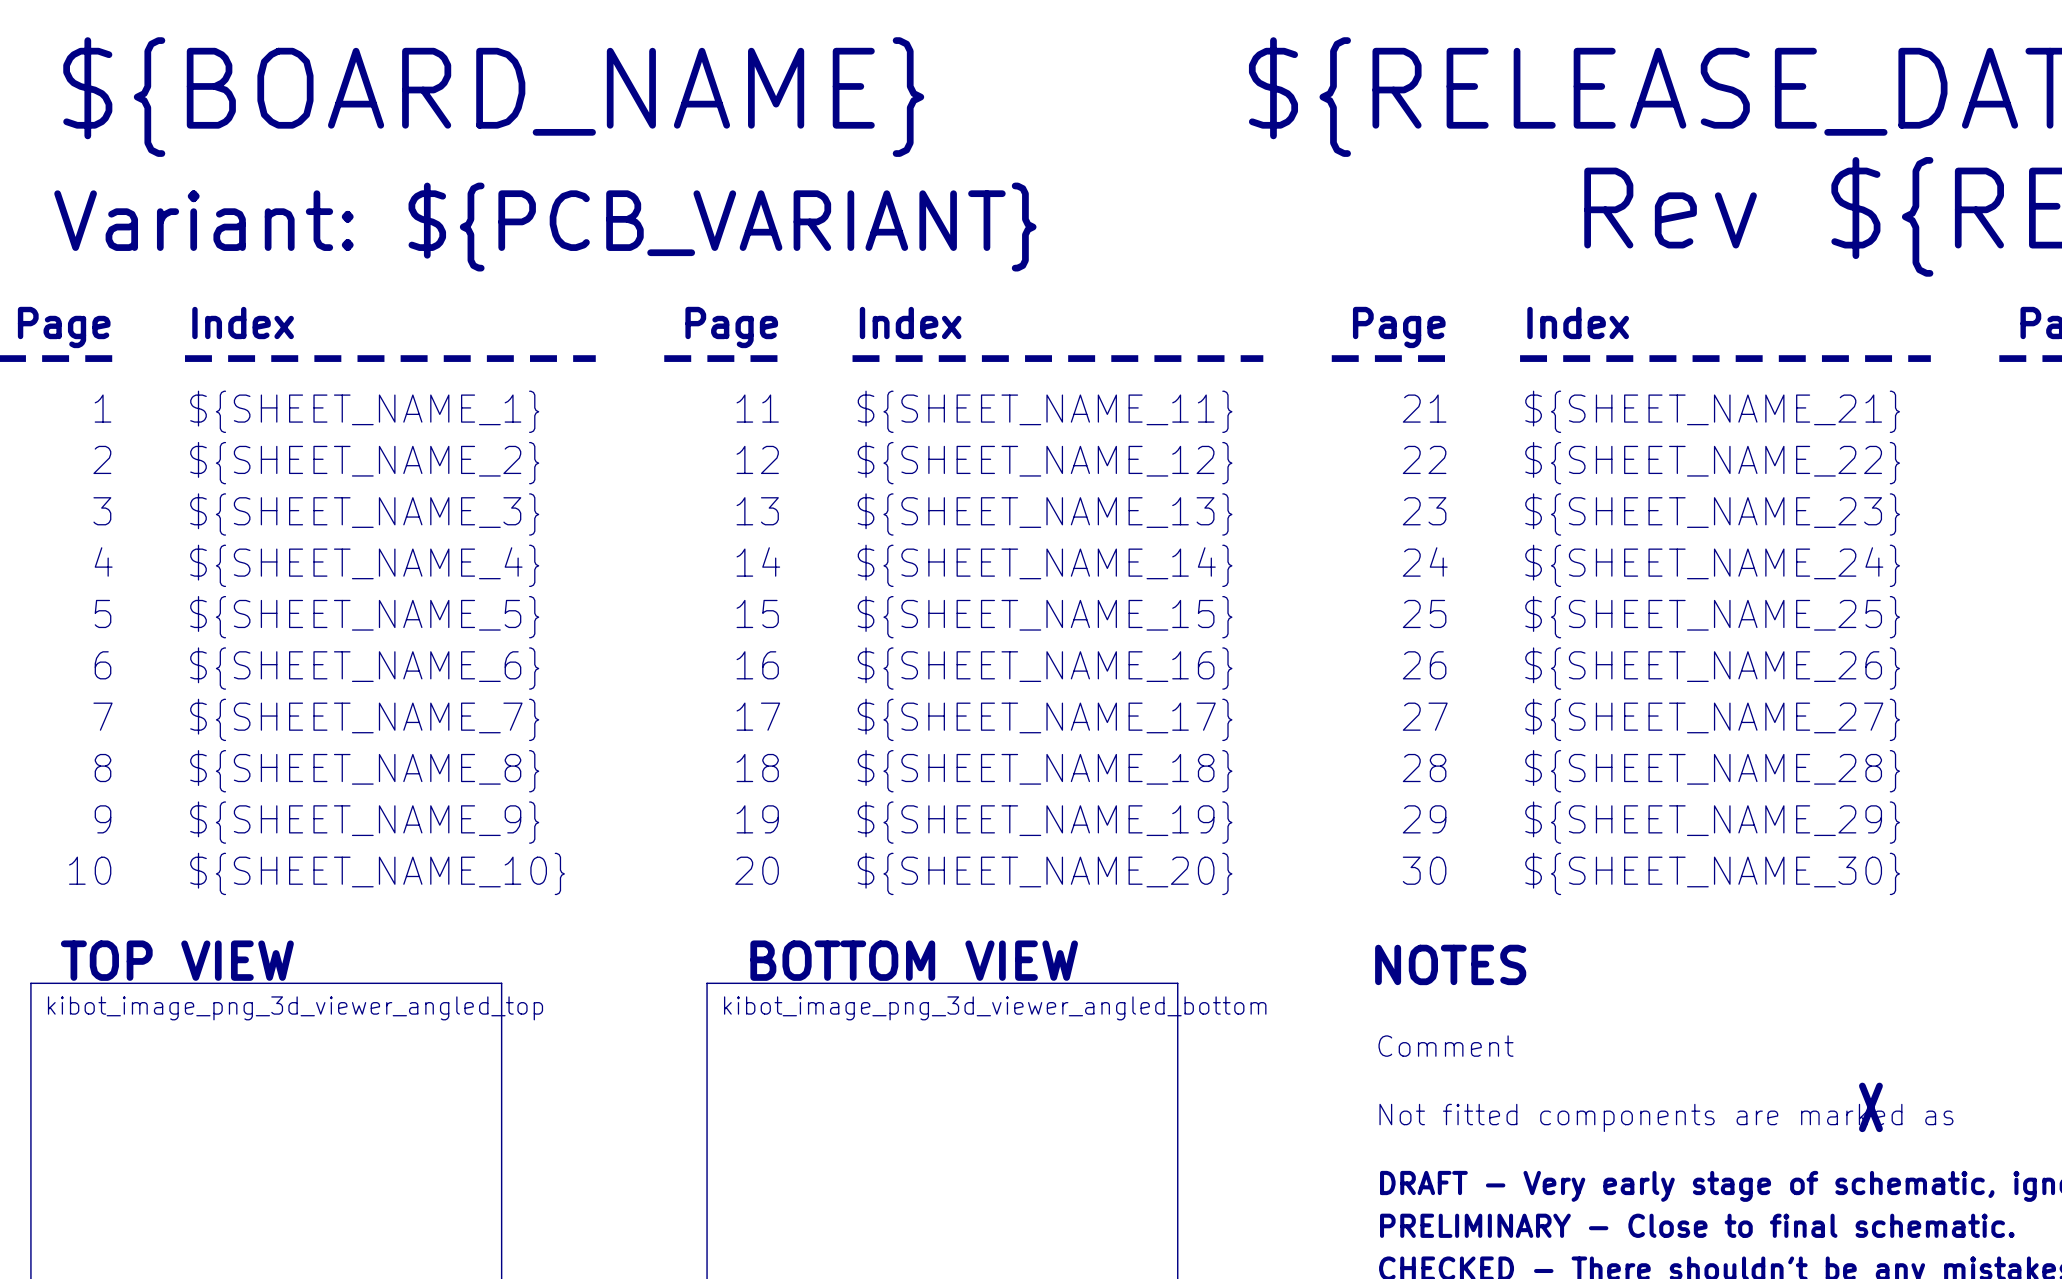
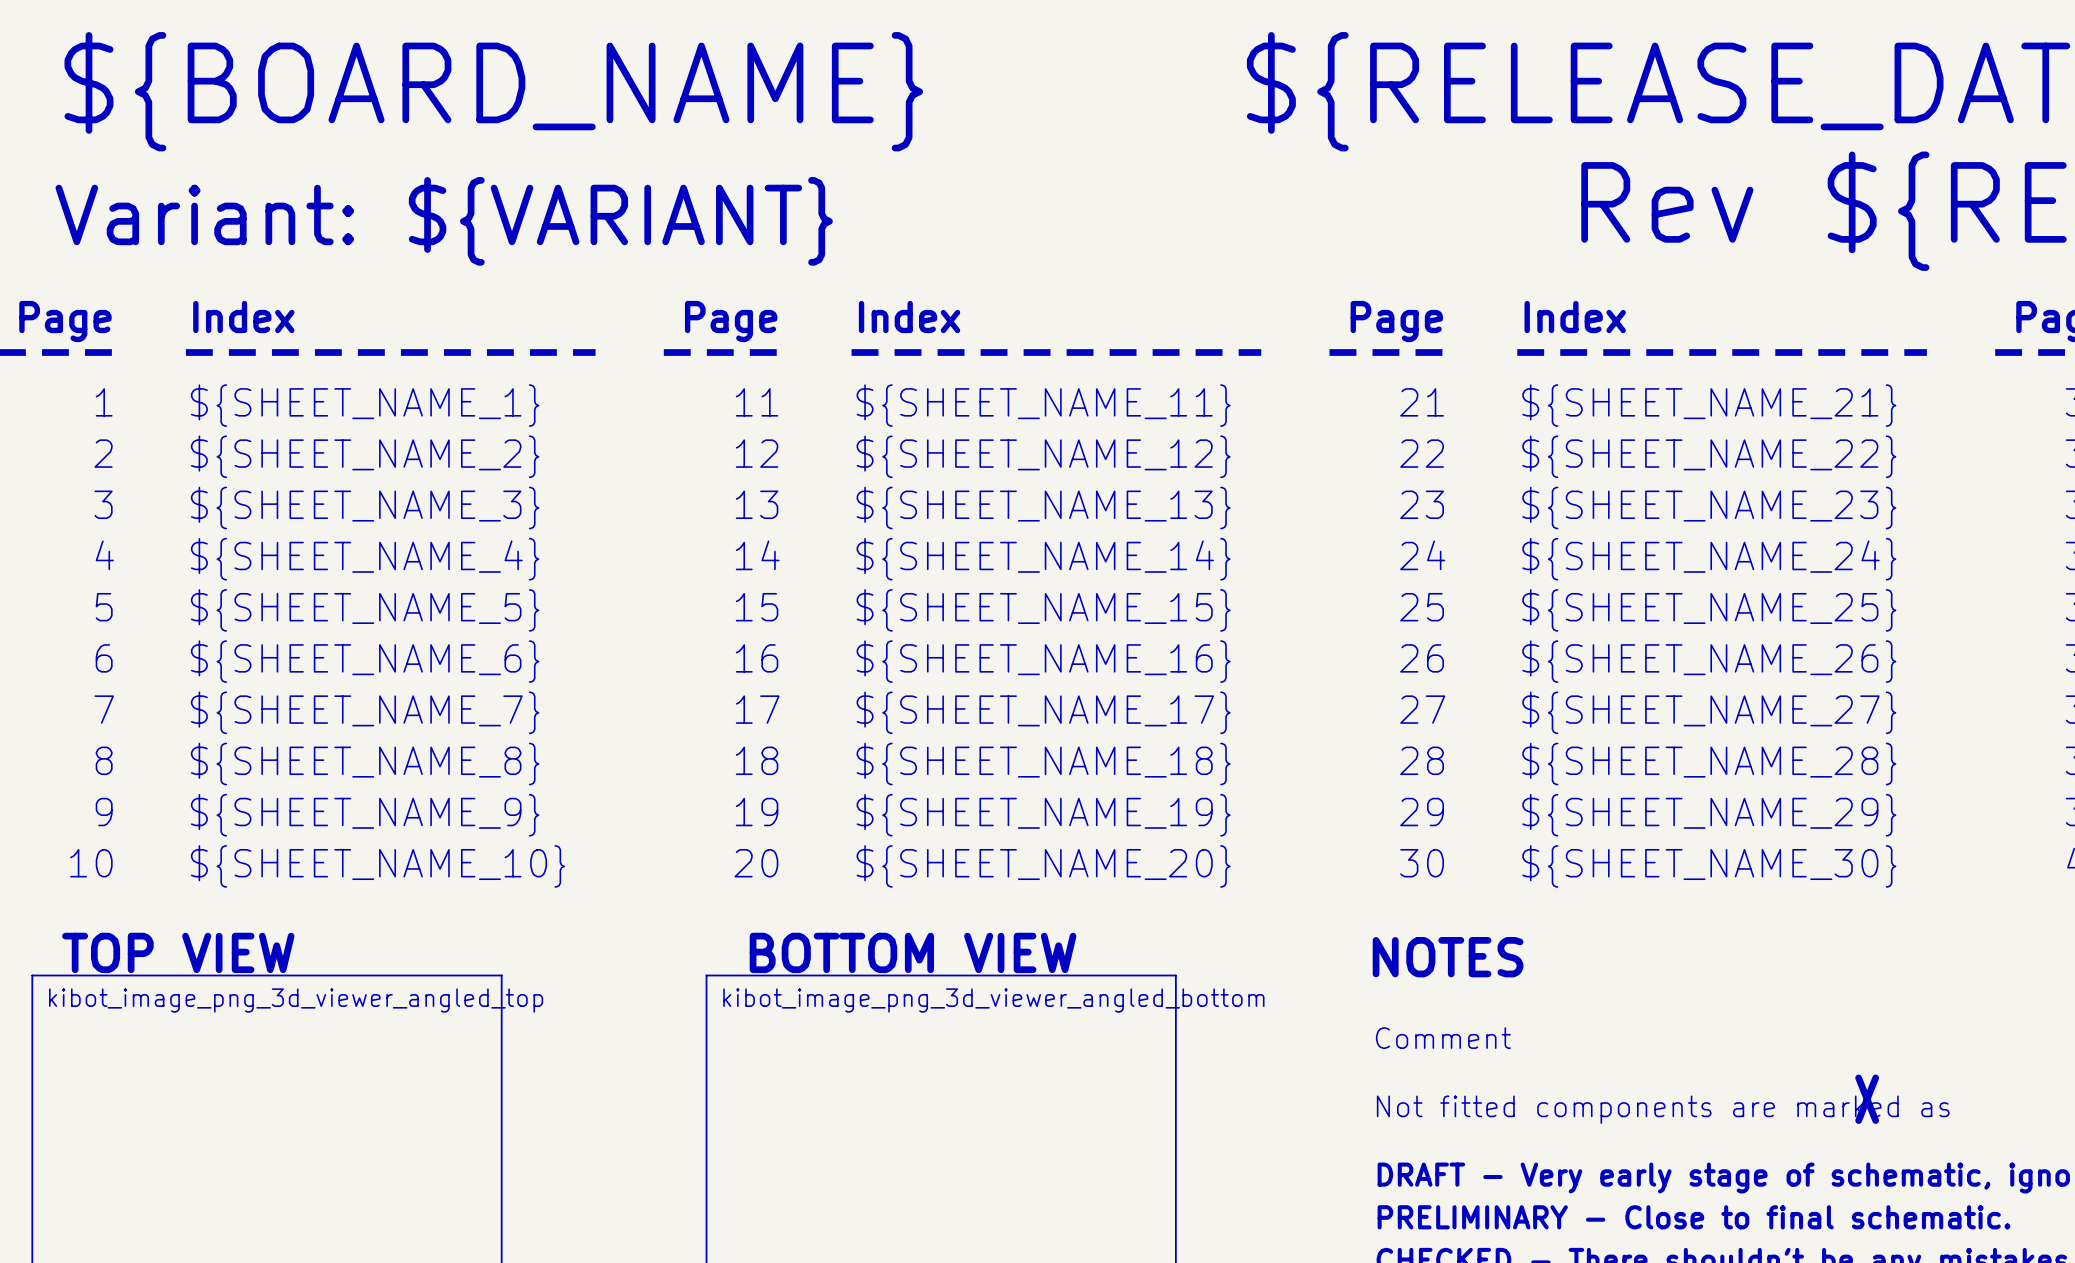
text: Variant: ${PCB_VARIANT} (545, 227) -> Variant: ${VARIANT} (444, 221)

